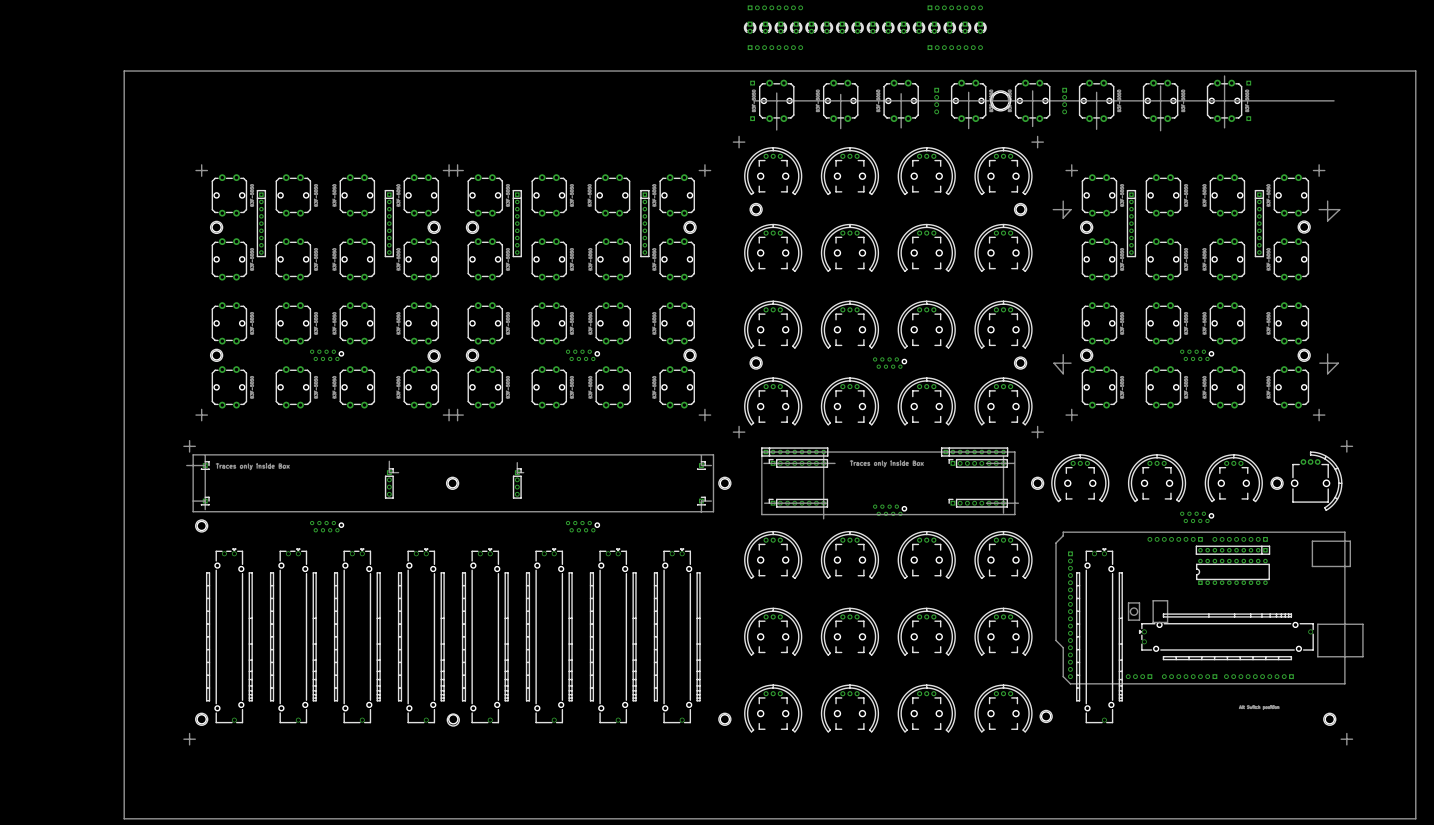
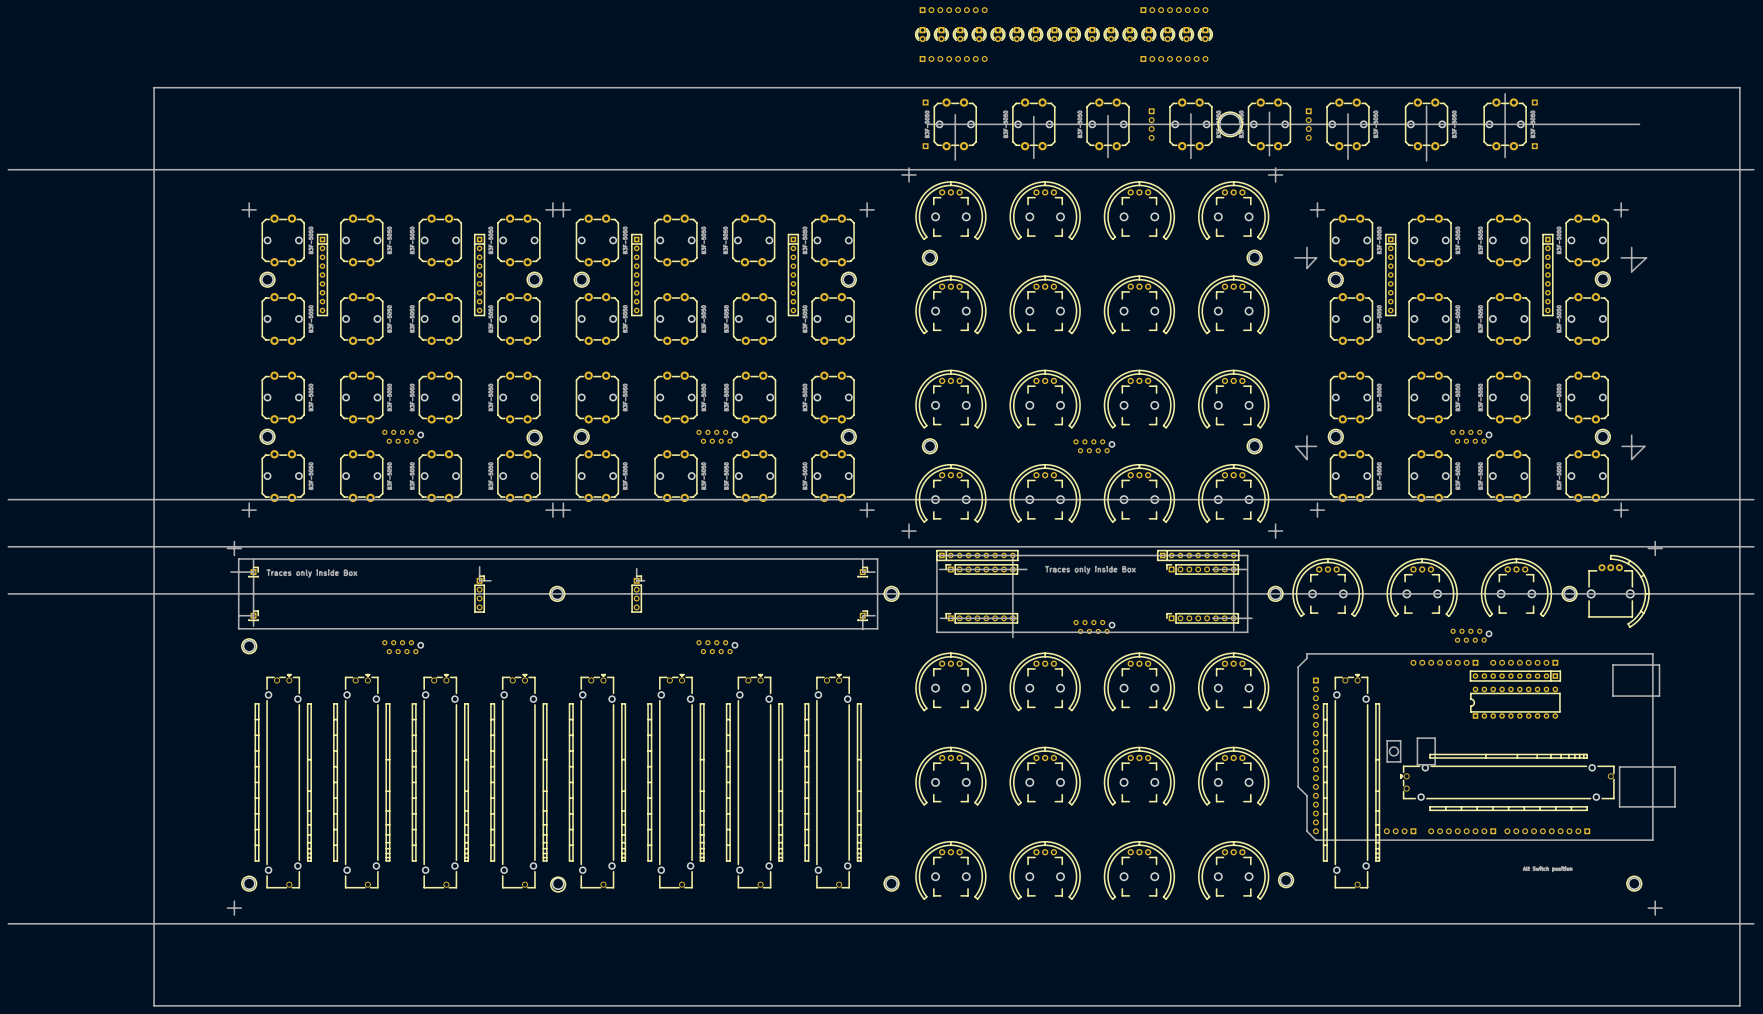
line: none -> (8, 169) (1753, 169)
line: none -> (8, 499) (1753, 499)
line: none -> (8, 546) (1753, 546)
line: none -> (8, 593) (1753, 593)
line: none -> (8, 923) (1753, 923)

